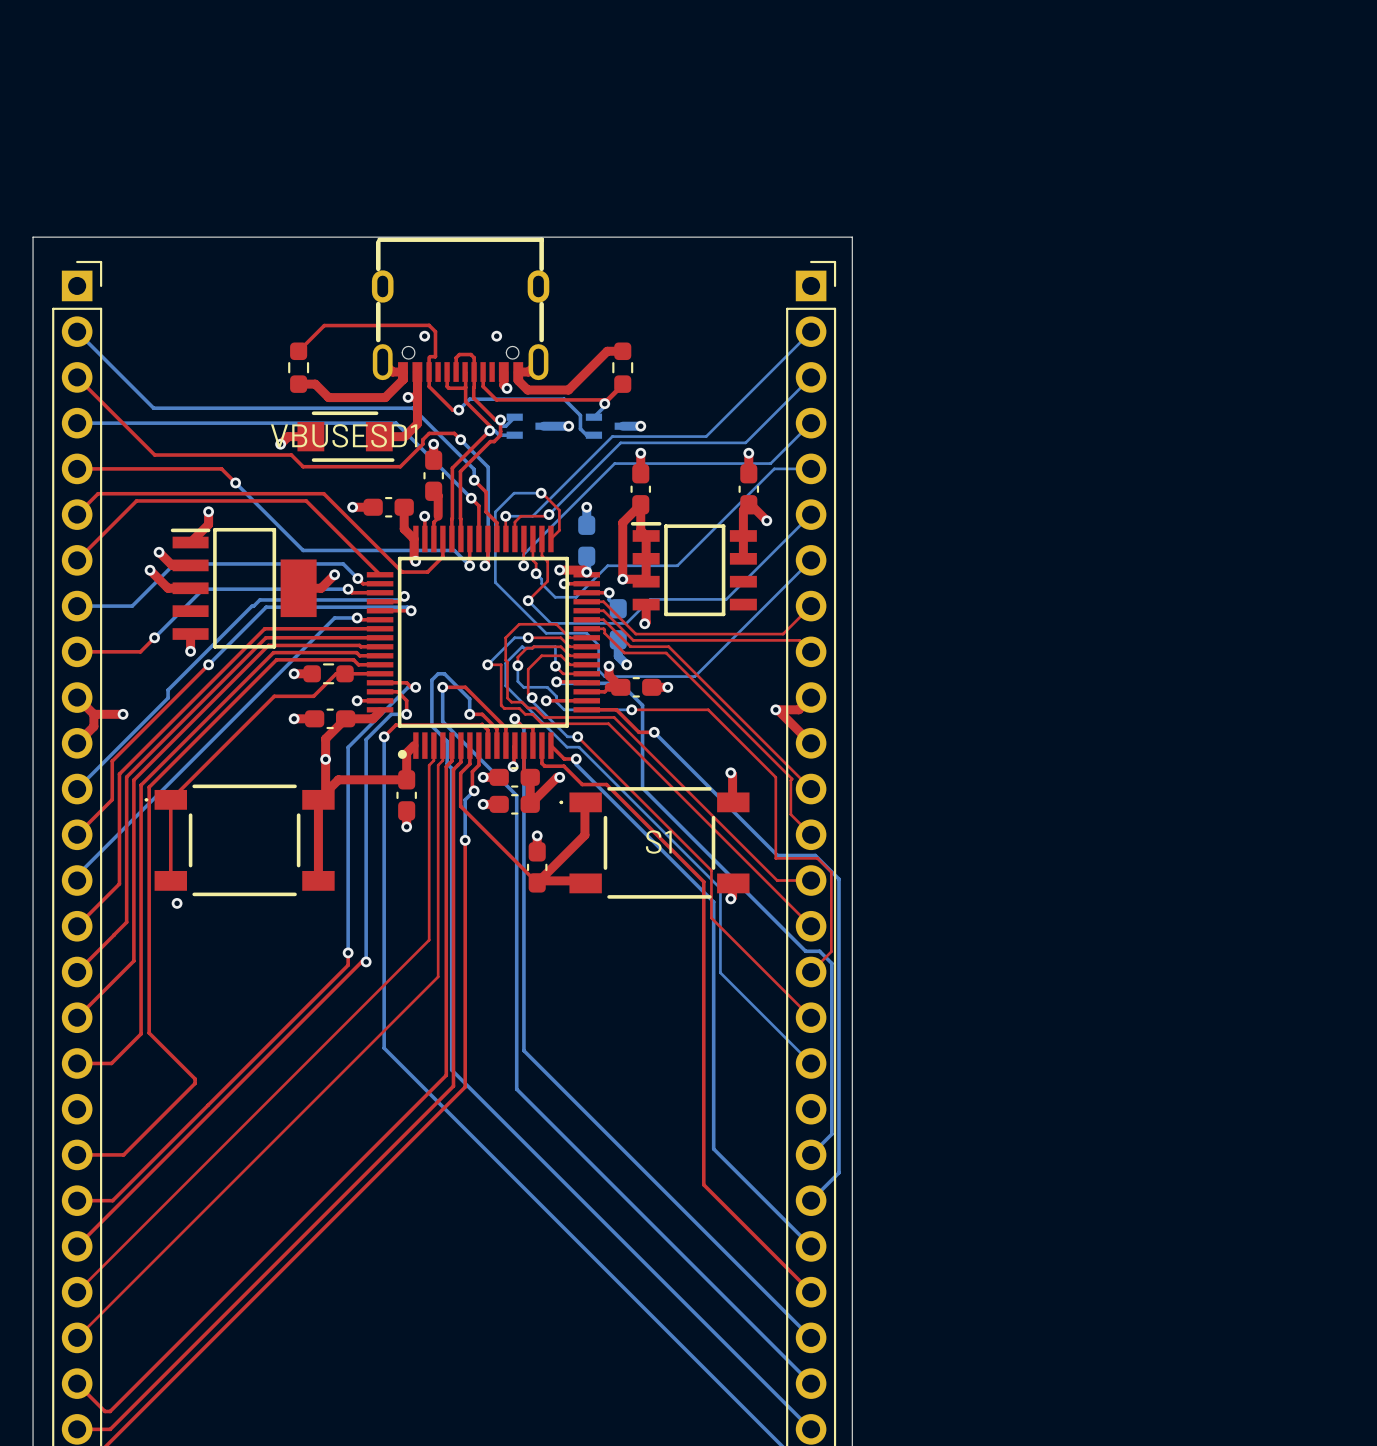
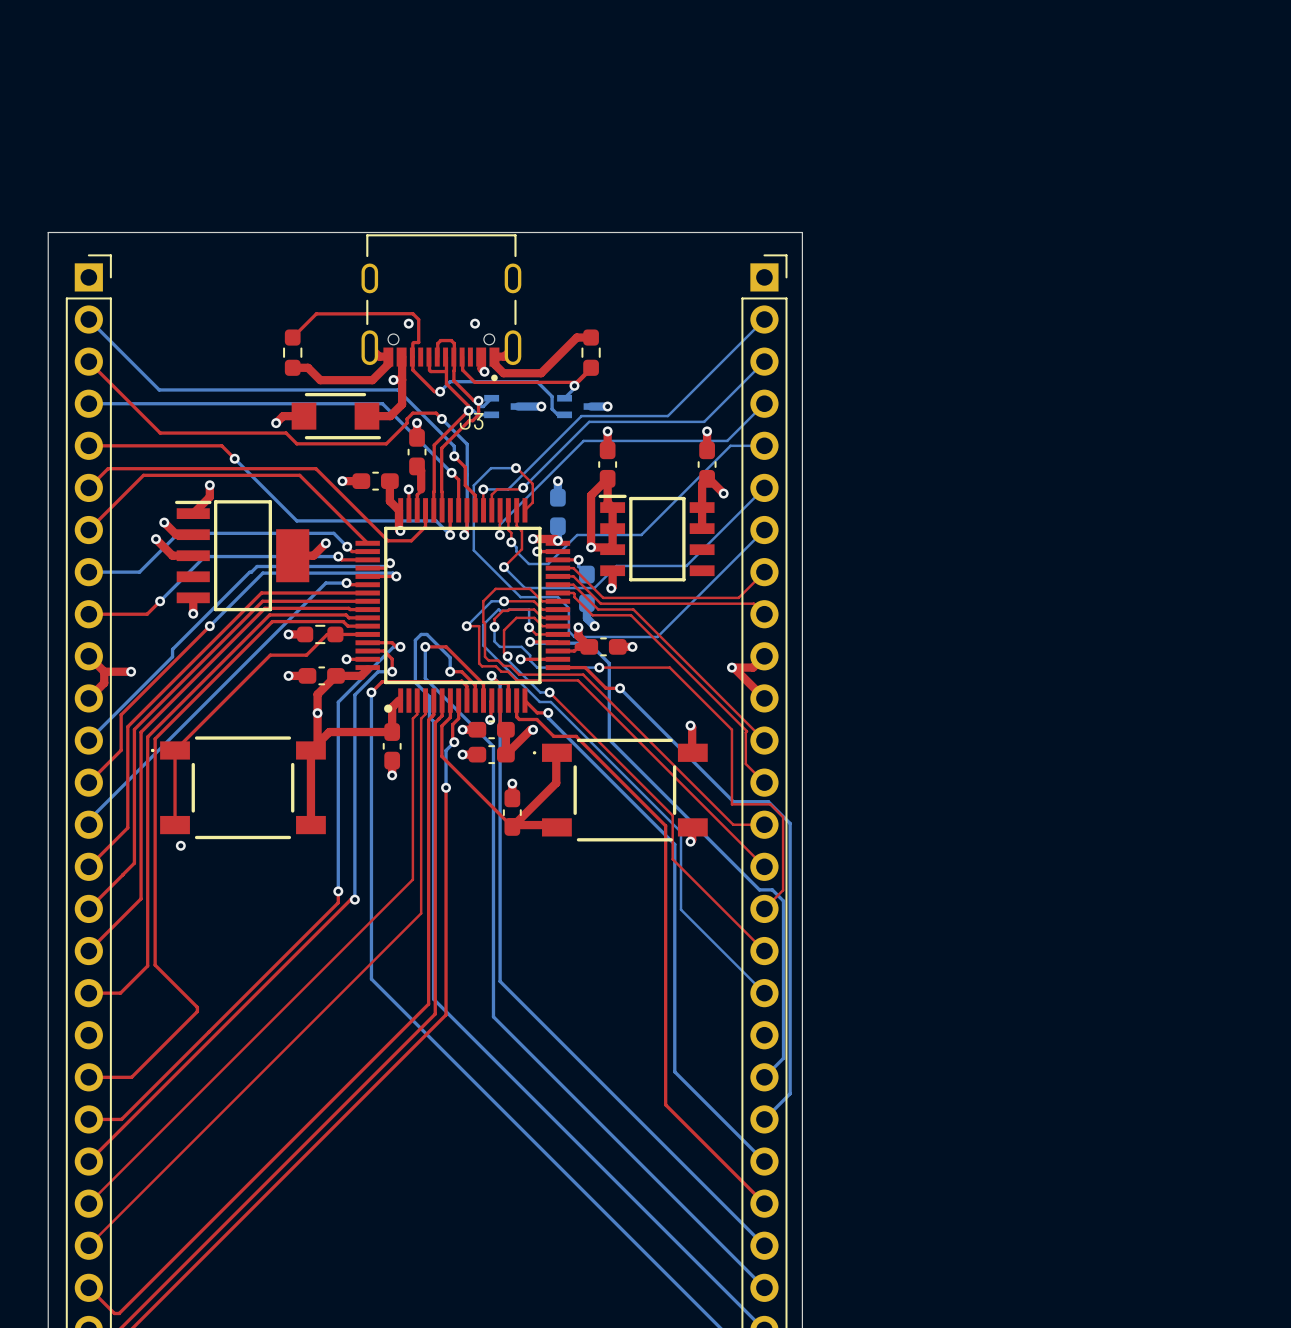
part: (460, 309) -> none
J3: none -> (441, 307)
VBUSESD1 name: VBUSESD1 (344, 435) -> none
S1 name: S1 (658, 842) -> none

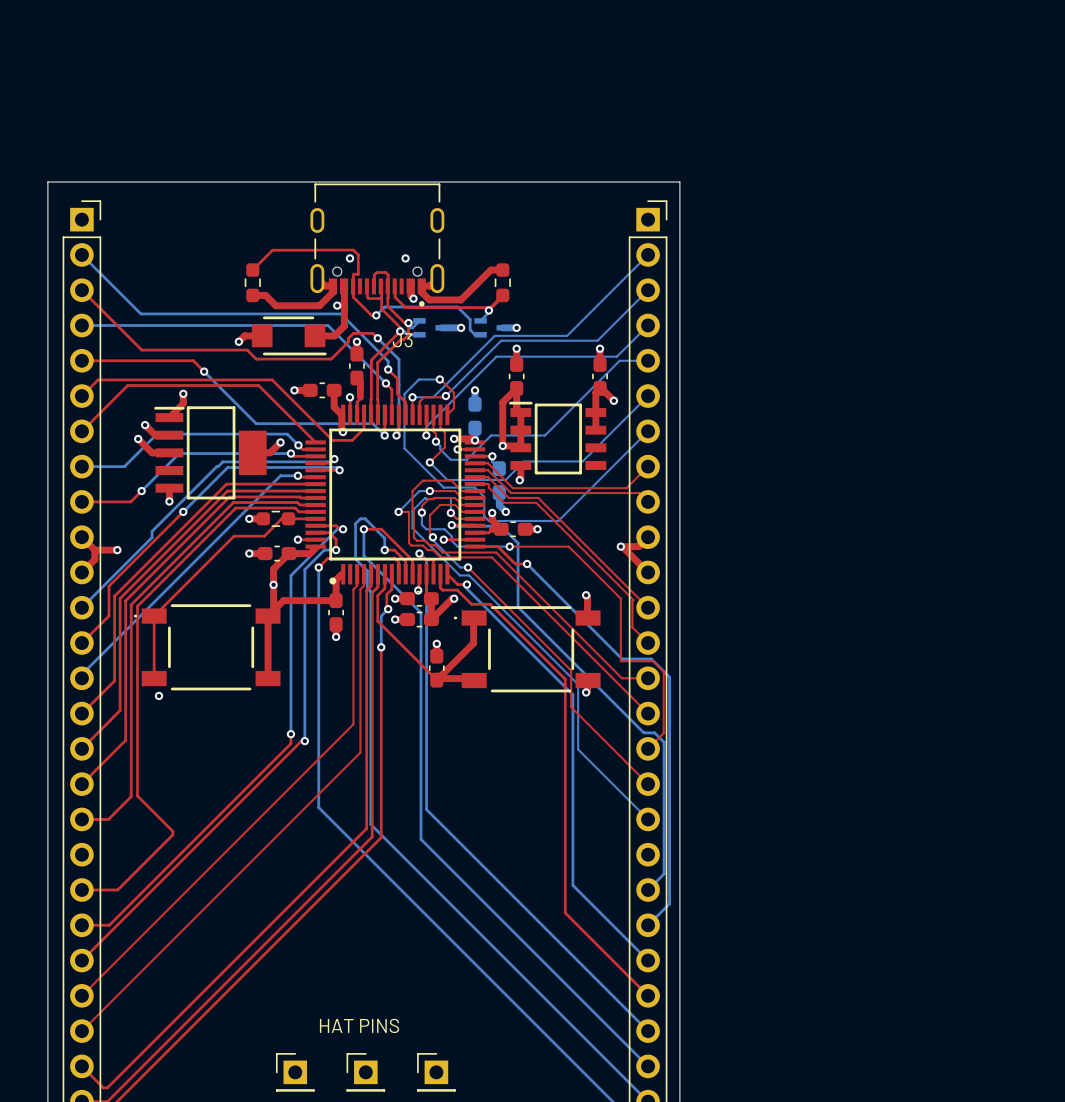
text: none -> HAT PINS (359, 1025)
part: none -> (295, 1072)
part: none -> (365, 1072)
part: none -> (436, 1072)

